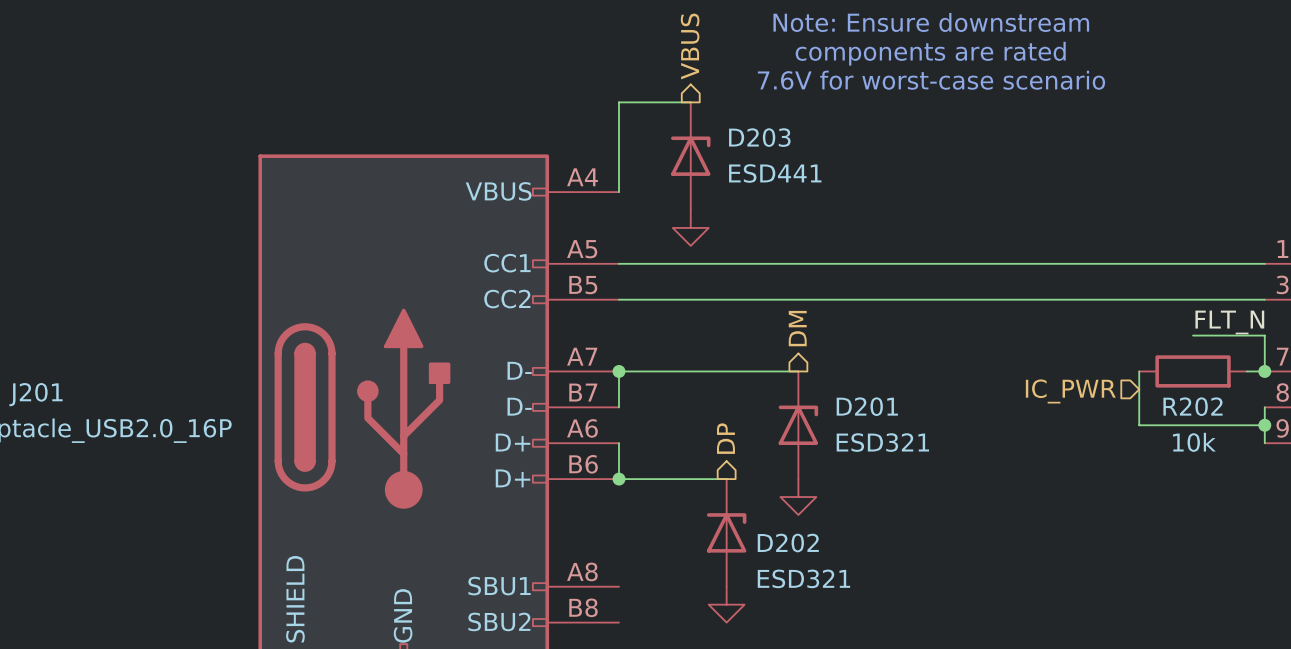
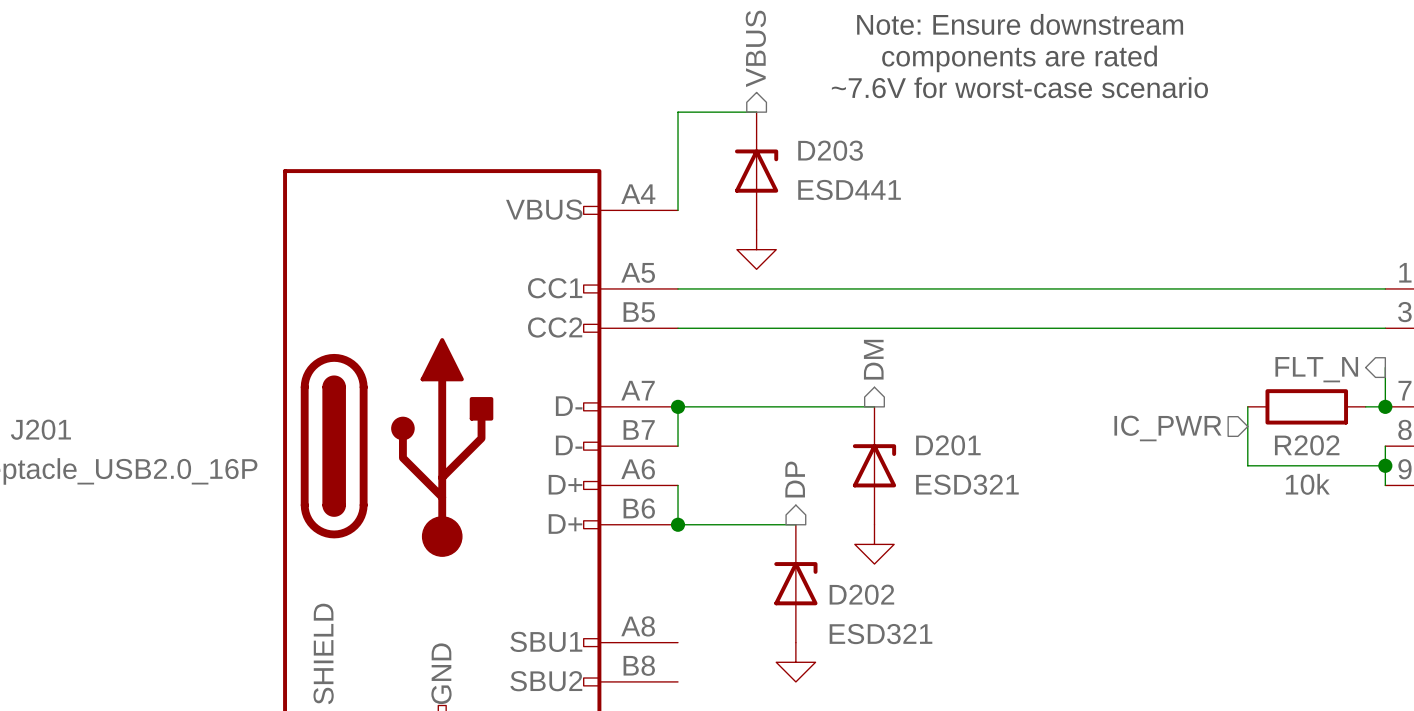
text: 7.6V for worst-case scenario (931, 80) -> ~7.6V for worst-case scenario (1019, 87)
label: FLT_N (1229, 322) -> none
wire: (1193, 335) (1264, 335) -> none
hierarchical label: none -> FLT_N (1316, 369)

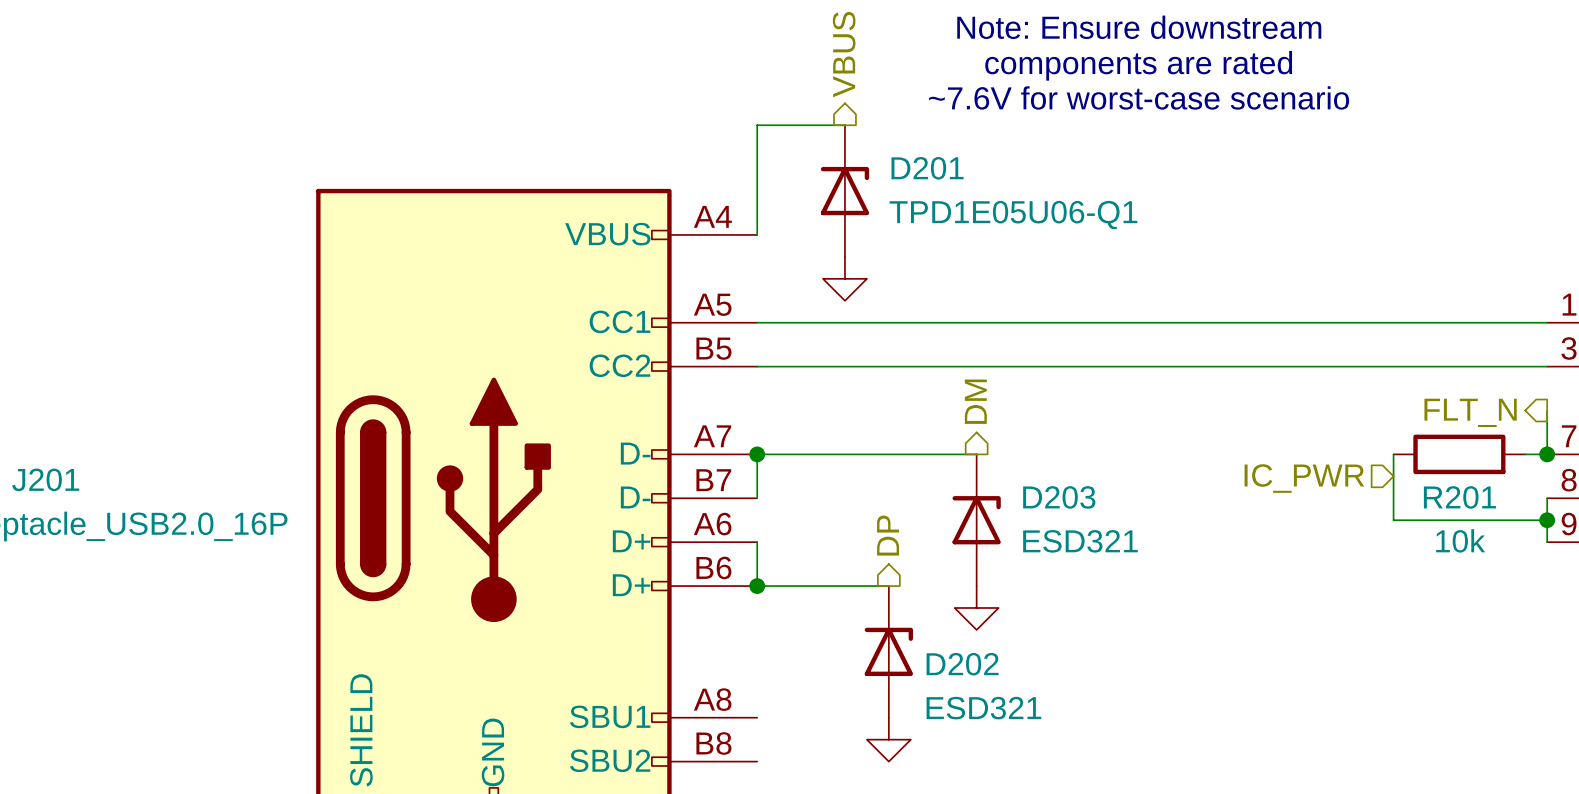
D203 name: D203 (830, 150) -> D201 (927, 168)
D203 value: ESD441 (849, 189) -> TPD1E05U06-Q1 (1013, 215)
D201 name: D201 (948, 445) -> D203 (1059, 497)
R202 name: R202 (1307, 445) -> R201 (1459, 497)

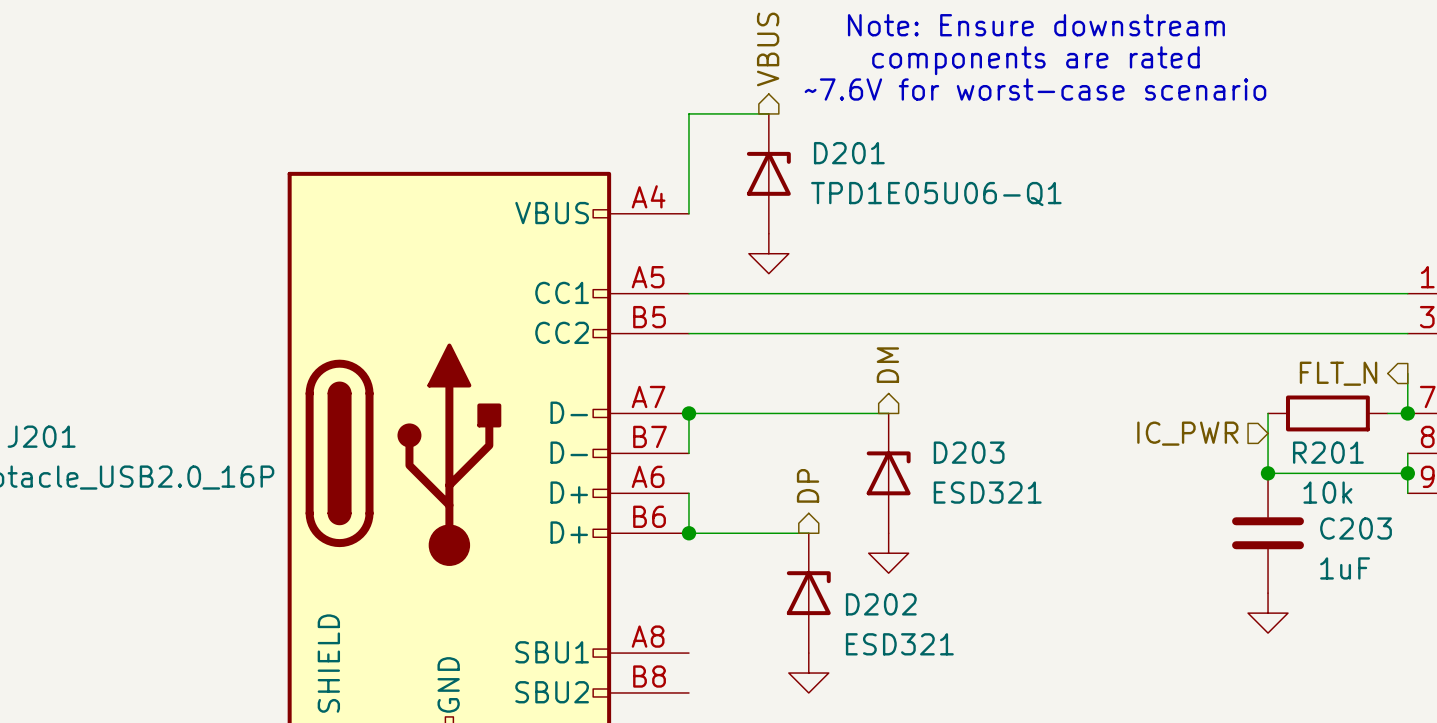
junction: none -> (1268, 473)
C203: none -> 1uF (1268, 533)
power symbol: none -> (1268, 613)

